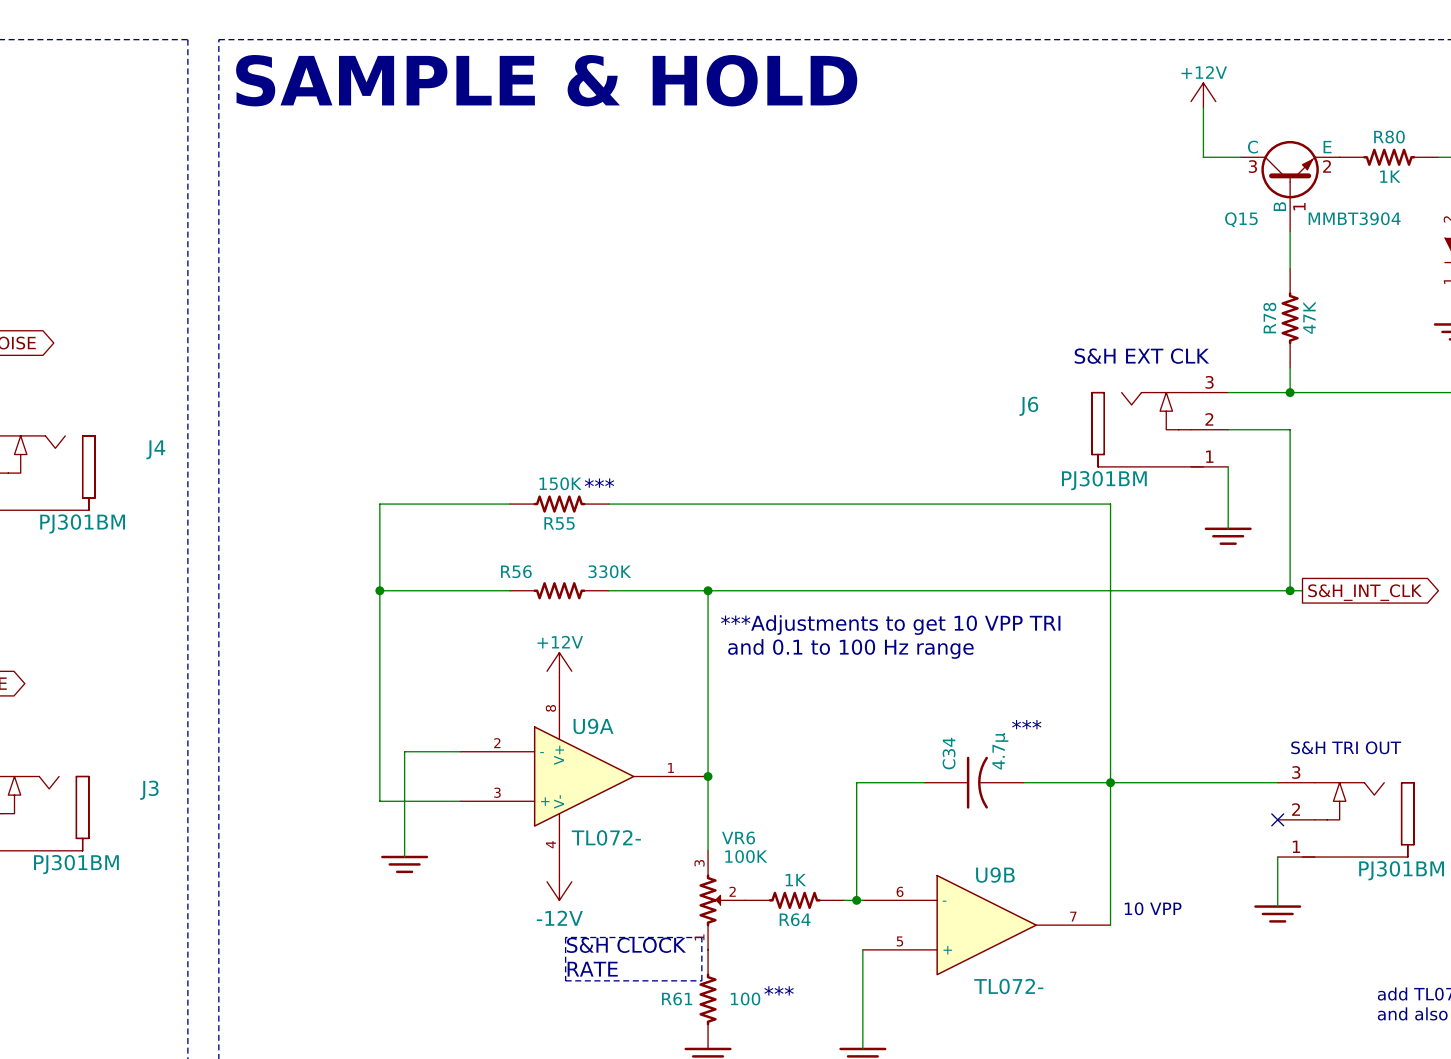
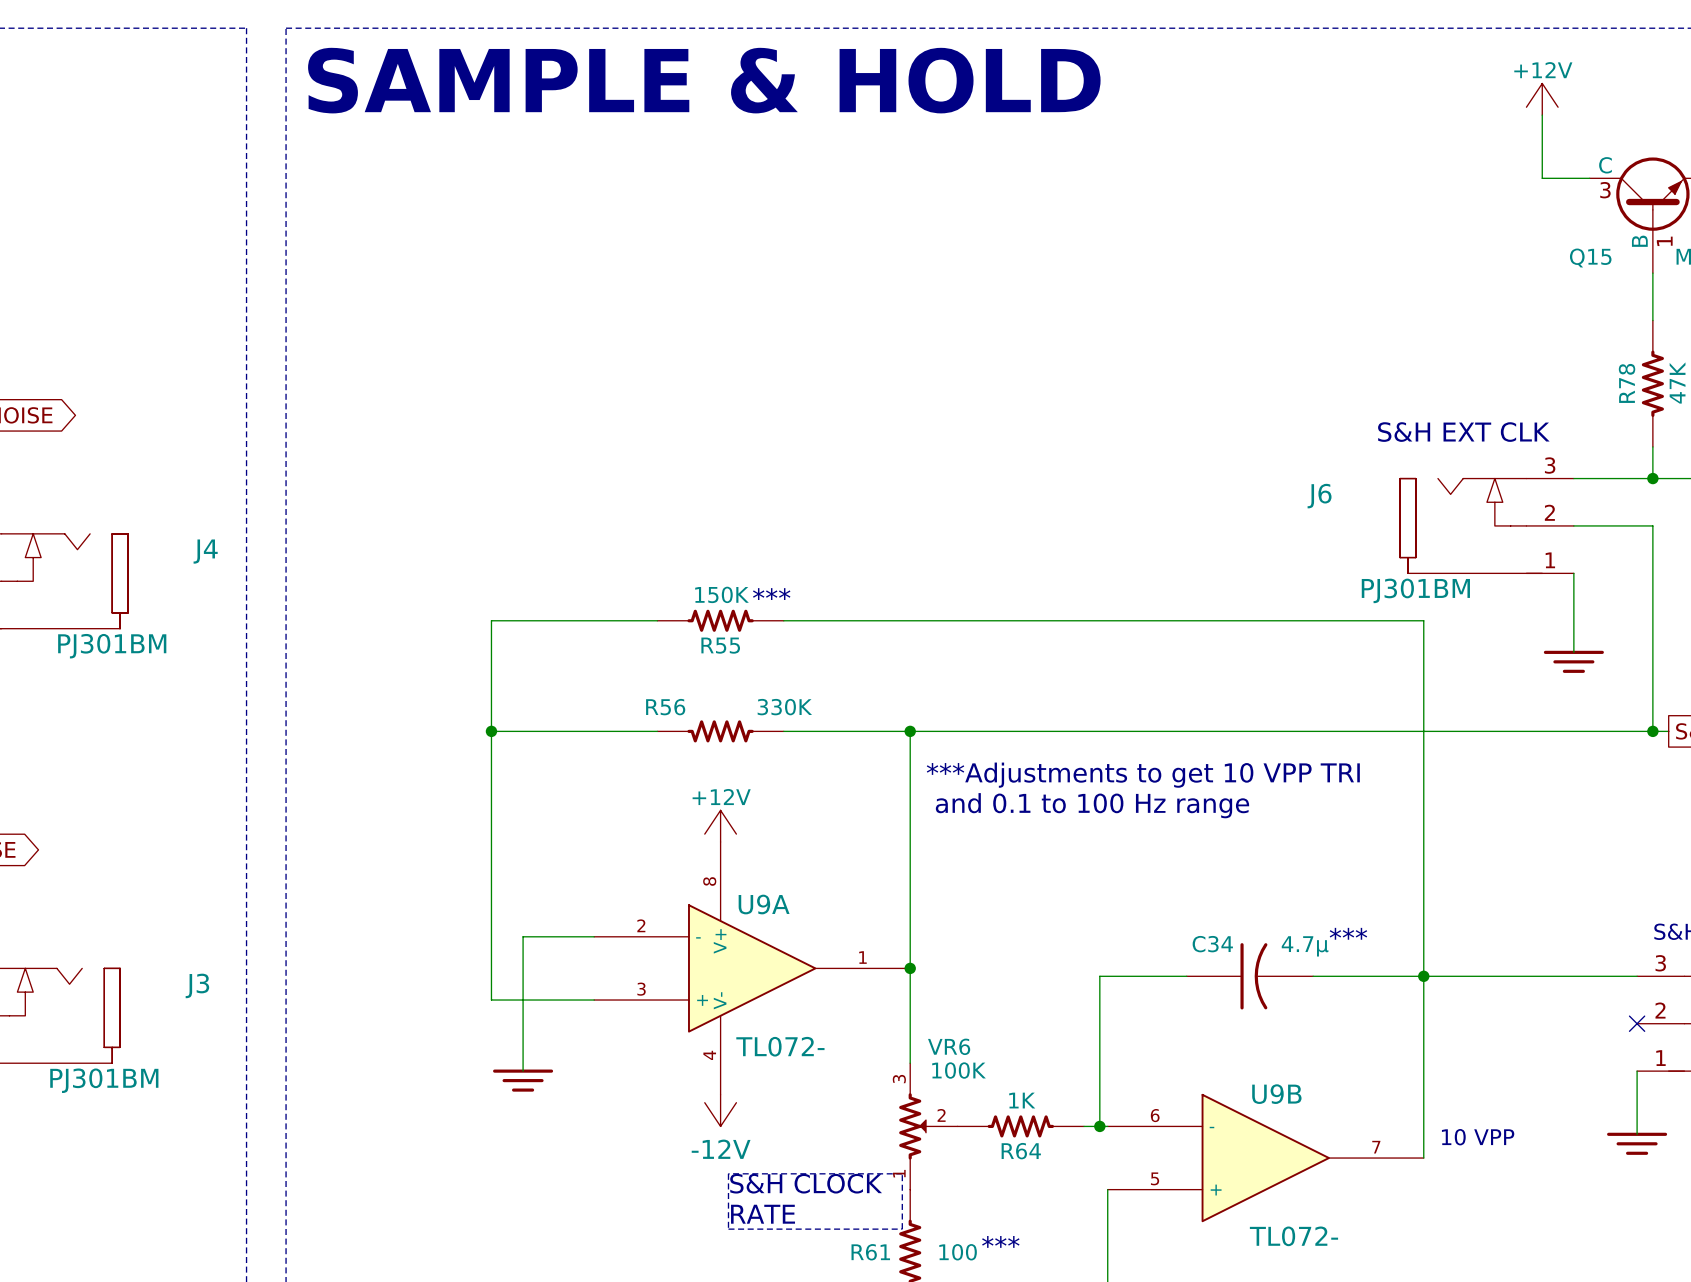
text position: *** (1026, 724) -> *** (1348, 933)
C34 value rotation: 0° (1000, 751) -> 90° clockwise (1305, 946)
C34 name rotation: 0° (949, 753) -> 90° clockwise (1212, 944)

